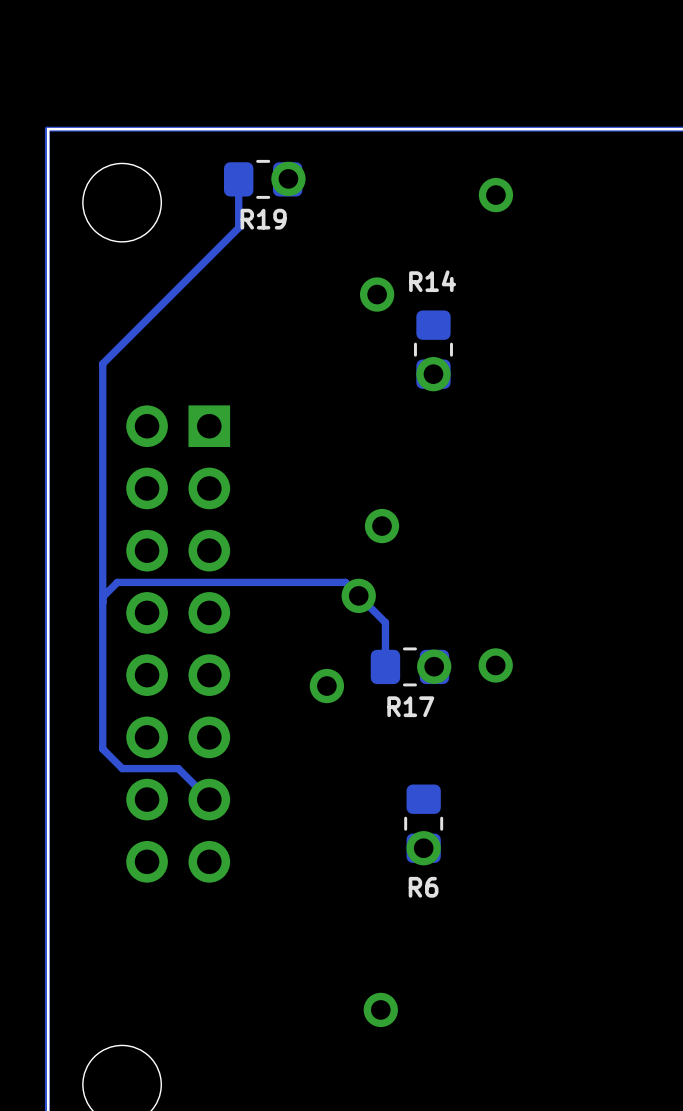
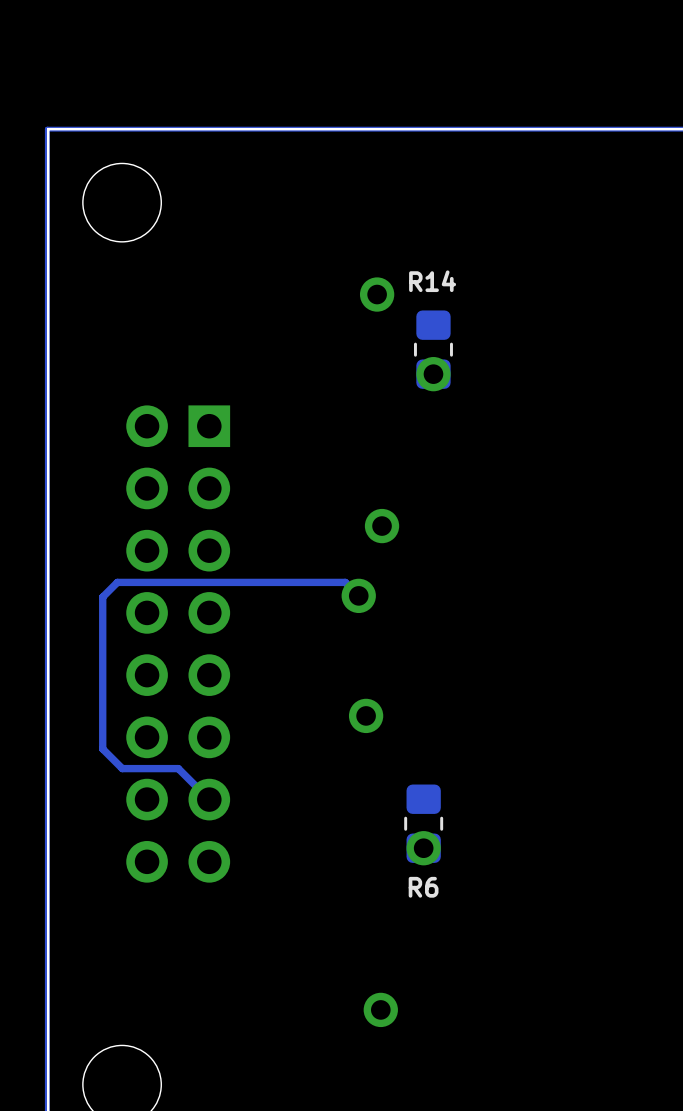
via: (288, 178) -> none
track: (238, 179) (238, 227) (102, 363) (102, 597) -> none
R19: (263, 179) -> none
via: (495, 195) -> none
track: (358, 595) (385, 622) (385, 666) -> none
via: (495, 665) -> none
R17: (409, 666) -> none
via: (434, 666) -> none
via: (326, 686) -> none
via: none -> (366, 715)

